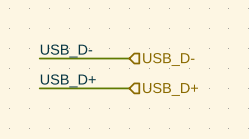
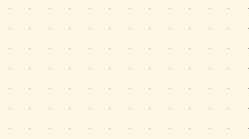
label: USB_D- (66, 51) -> none
wire: (39, 58) (129, 58) -> none
hierarchical label: USB_D- (168, 59) -> none
label: USB_D+ (68, 80) -> none
wire: (39, 88) (129, 88) -> none
hierarchical label: USB_D+ (170, 89) -> none

